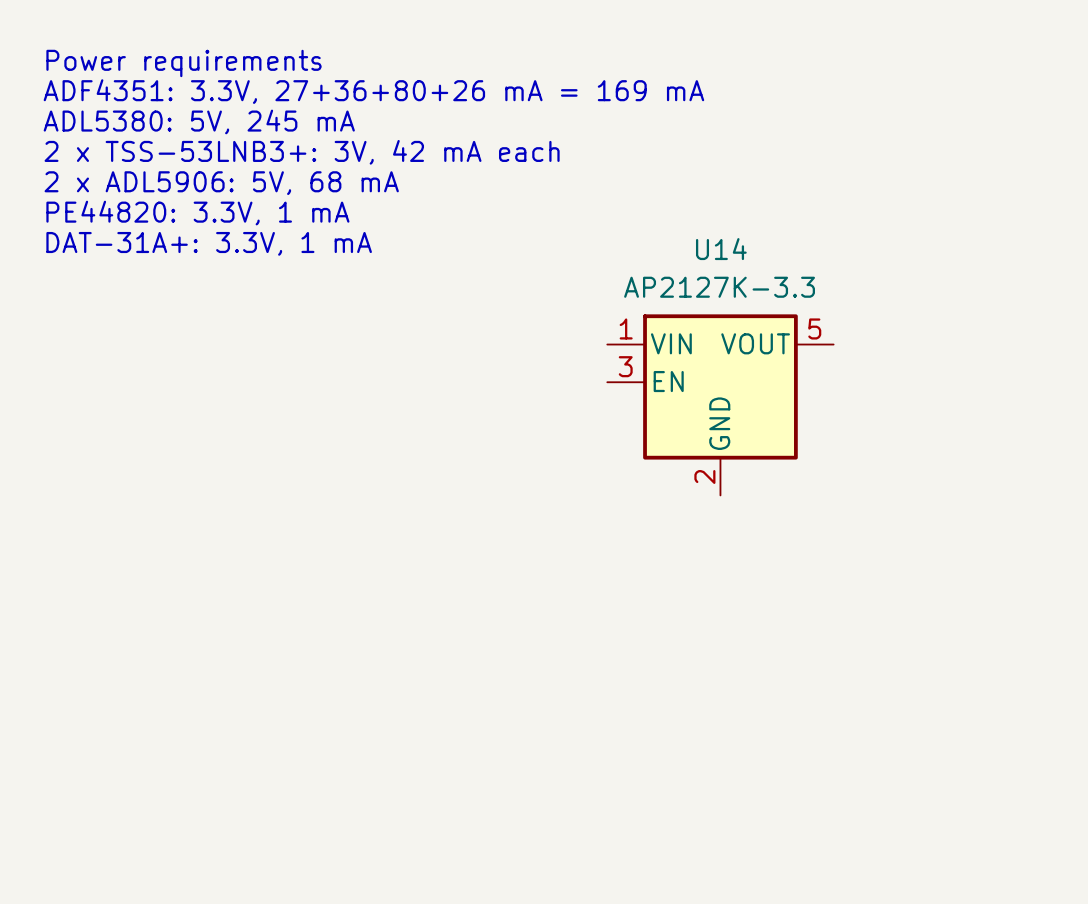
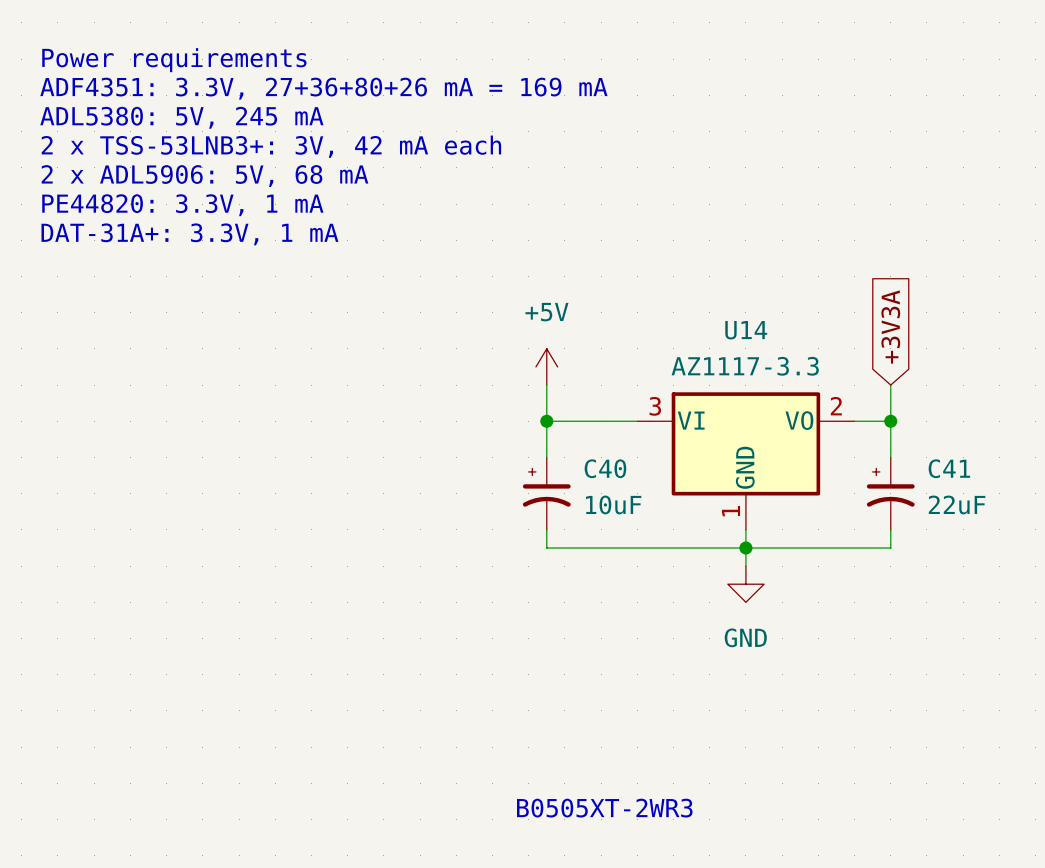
U14 value: AP2127K-3.3 (719, 287) -> AZ1117-3.3 (745, 366)
U14 symbol: [607, 314, 834, 496] -> [637, 392, 855, 530]
global label: none -> +3V3A (890, 326)
power symbol: none -> +5V (546, 366)
wire: none -> (546, 385) (546, 457)
wire: none -> (890, 385) (890, 457)
wire: none -> (546, 421) (637, 421)
junction: none -> (546, 421)
wire: none -> (854, 421) (890, 421)
junction: none -> (890, 421)
C40: none -> 10uF (546, 493)
C41: none -> 22uF (890, 493)
wire: none -> (546, 529) (546, 547) (890, 547) (890, 529)
wire: none -> (745, 529) (745, 566)
junction: none -> (745, 547)
power symbol: none -> GND (745, 584)
text: none -> B0505XT-2WR3 (604, 808)

